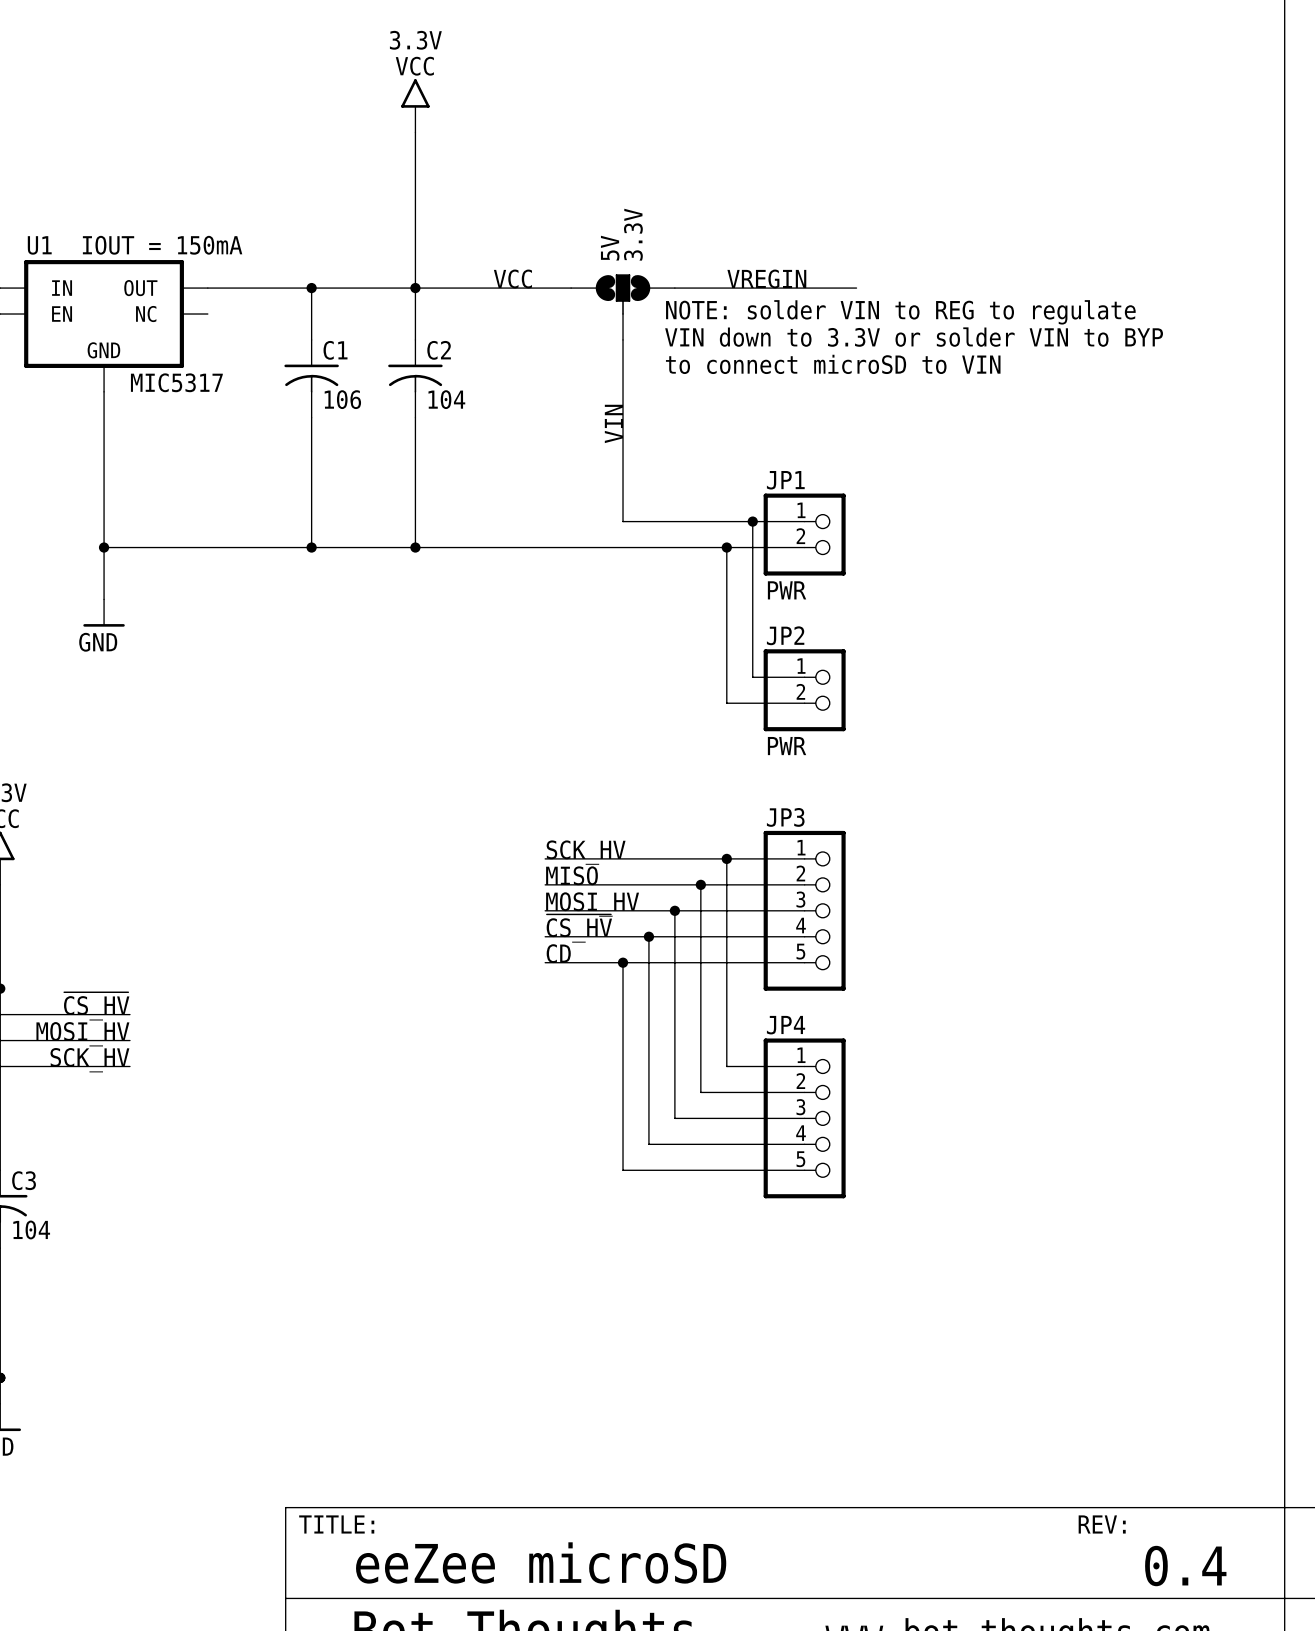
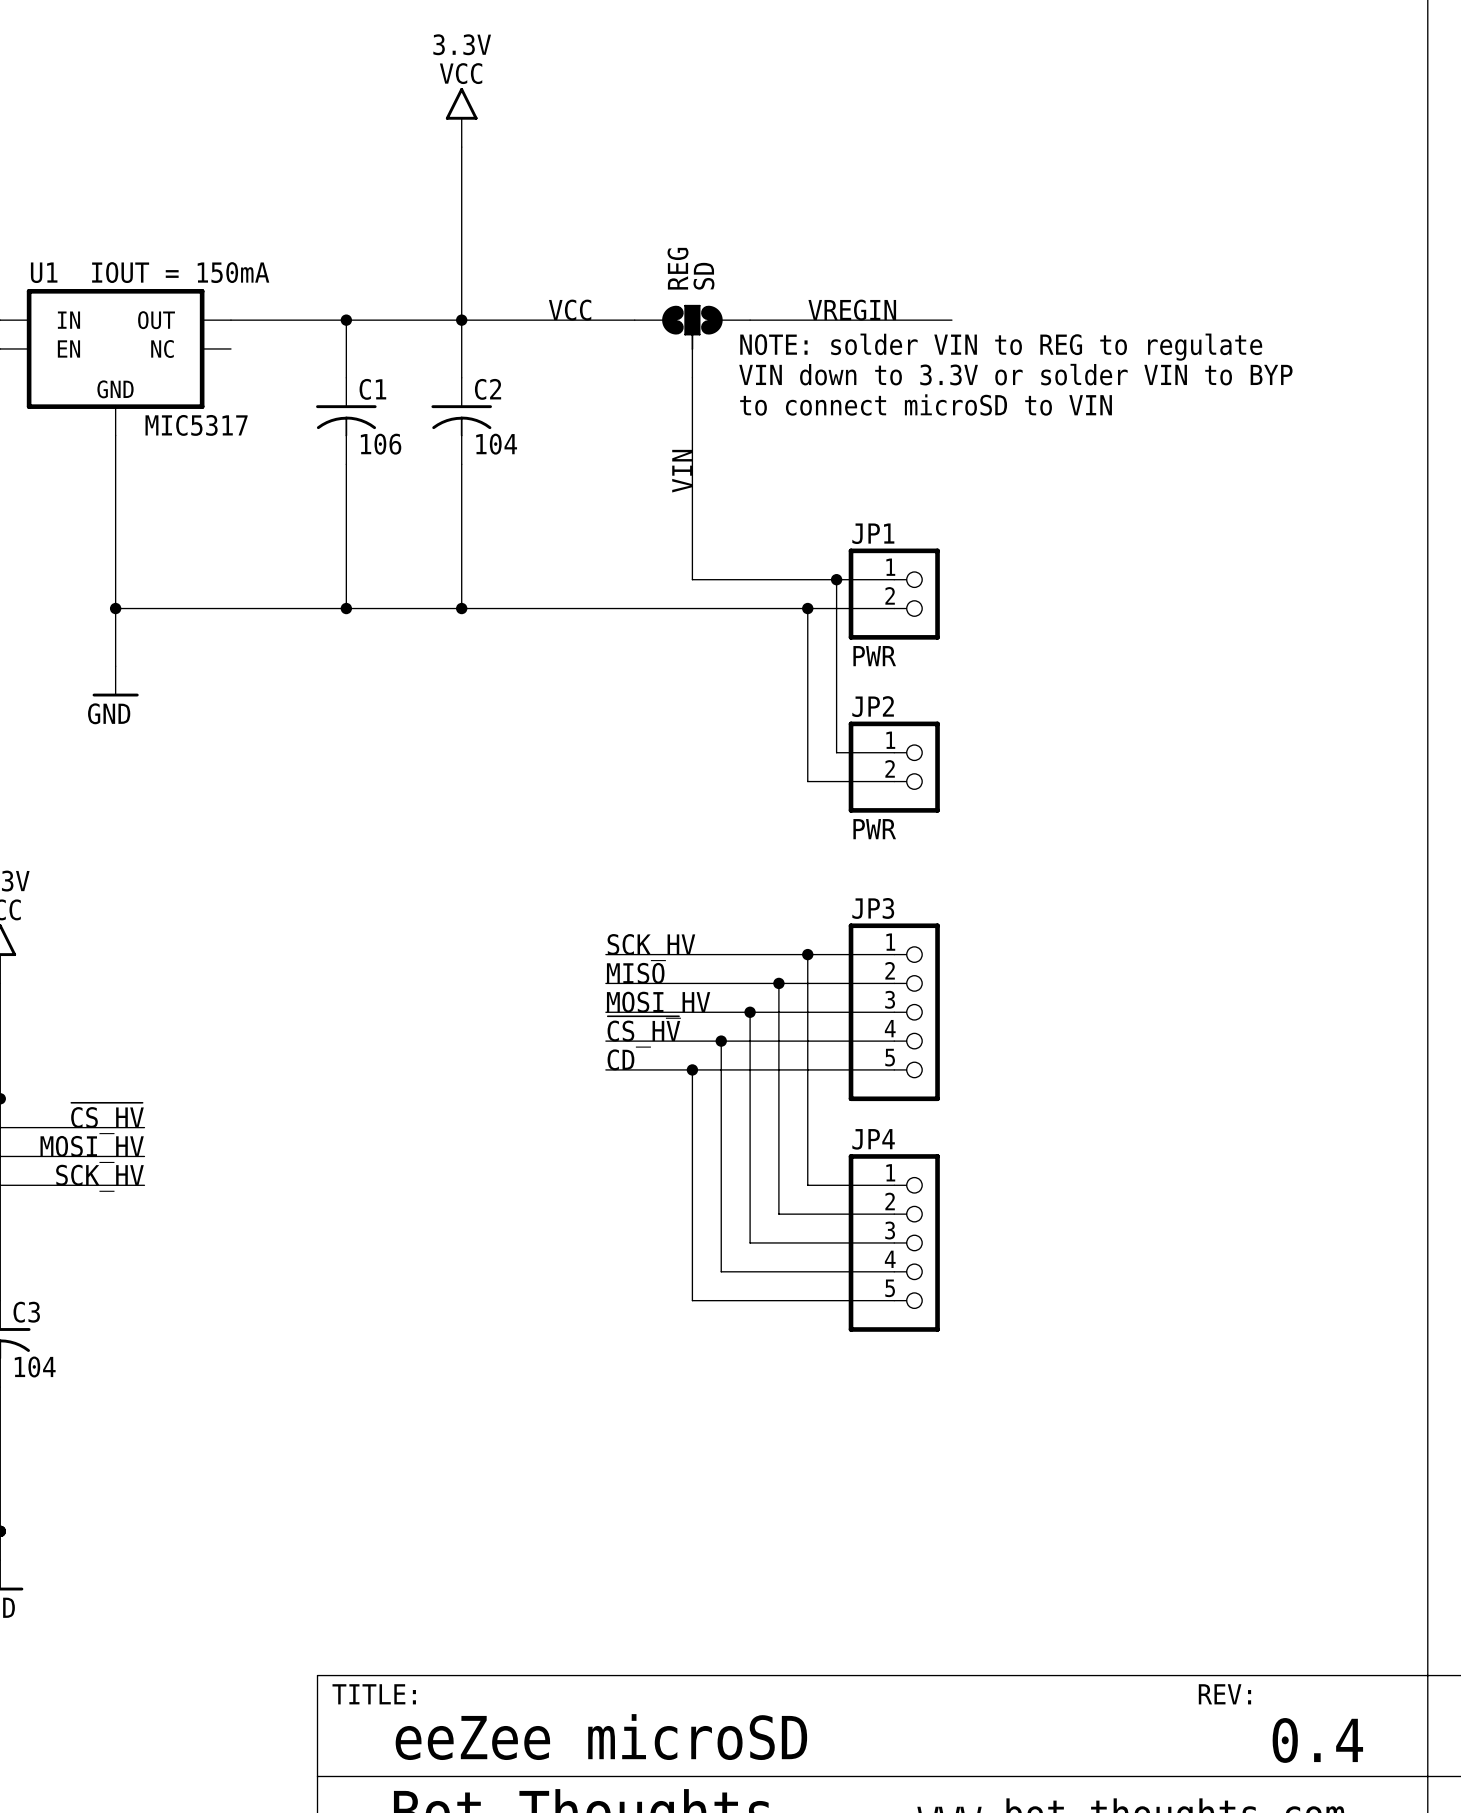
5V value: 3.3V (633, 234) -> SD (703, 276)
5V name: 5V (610, 248) -> REG (678, 268)

